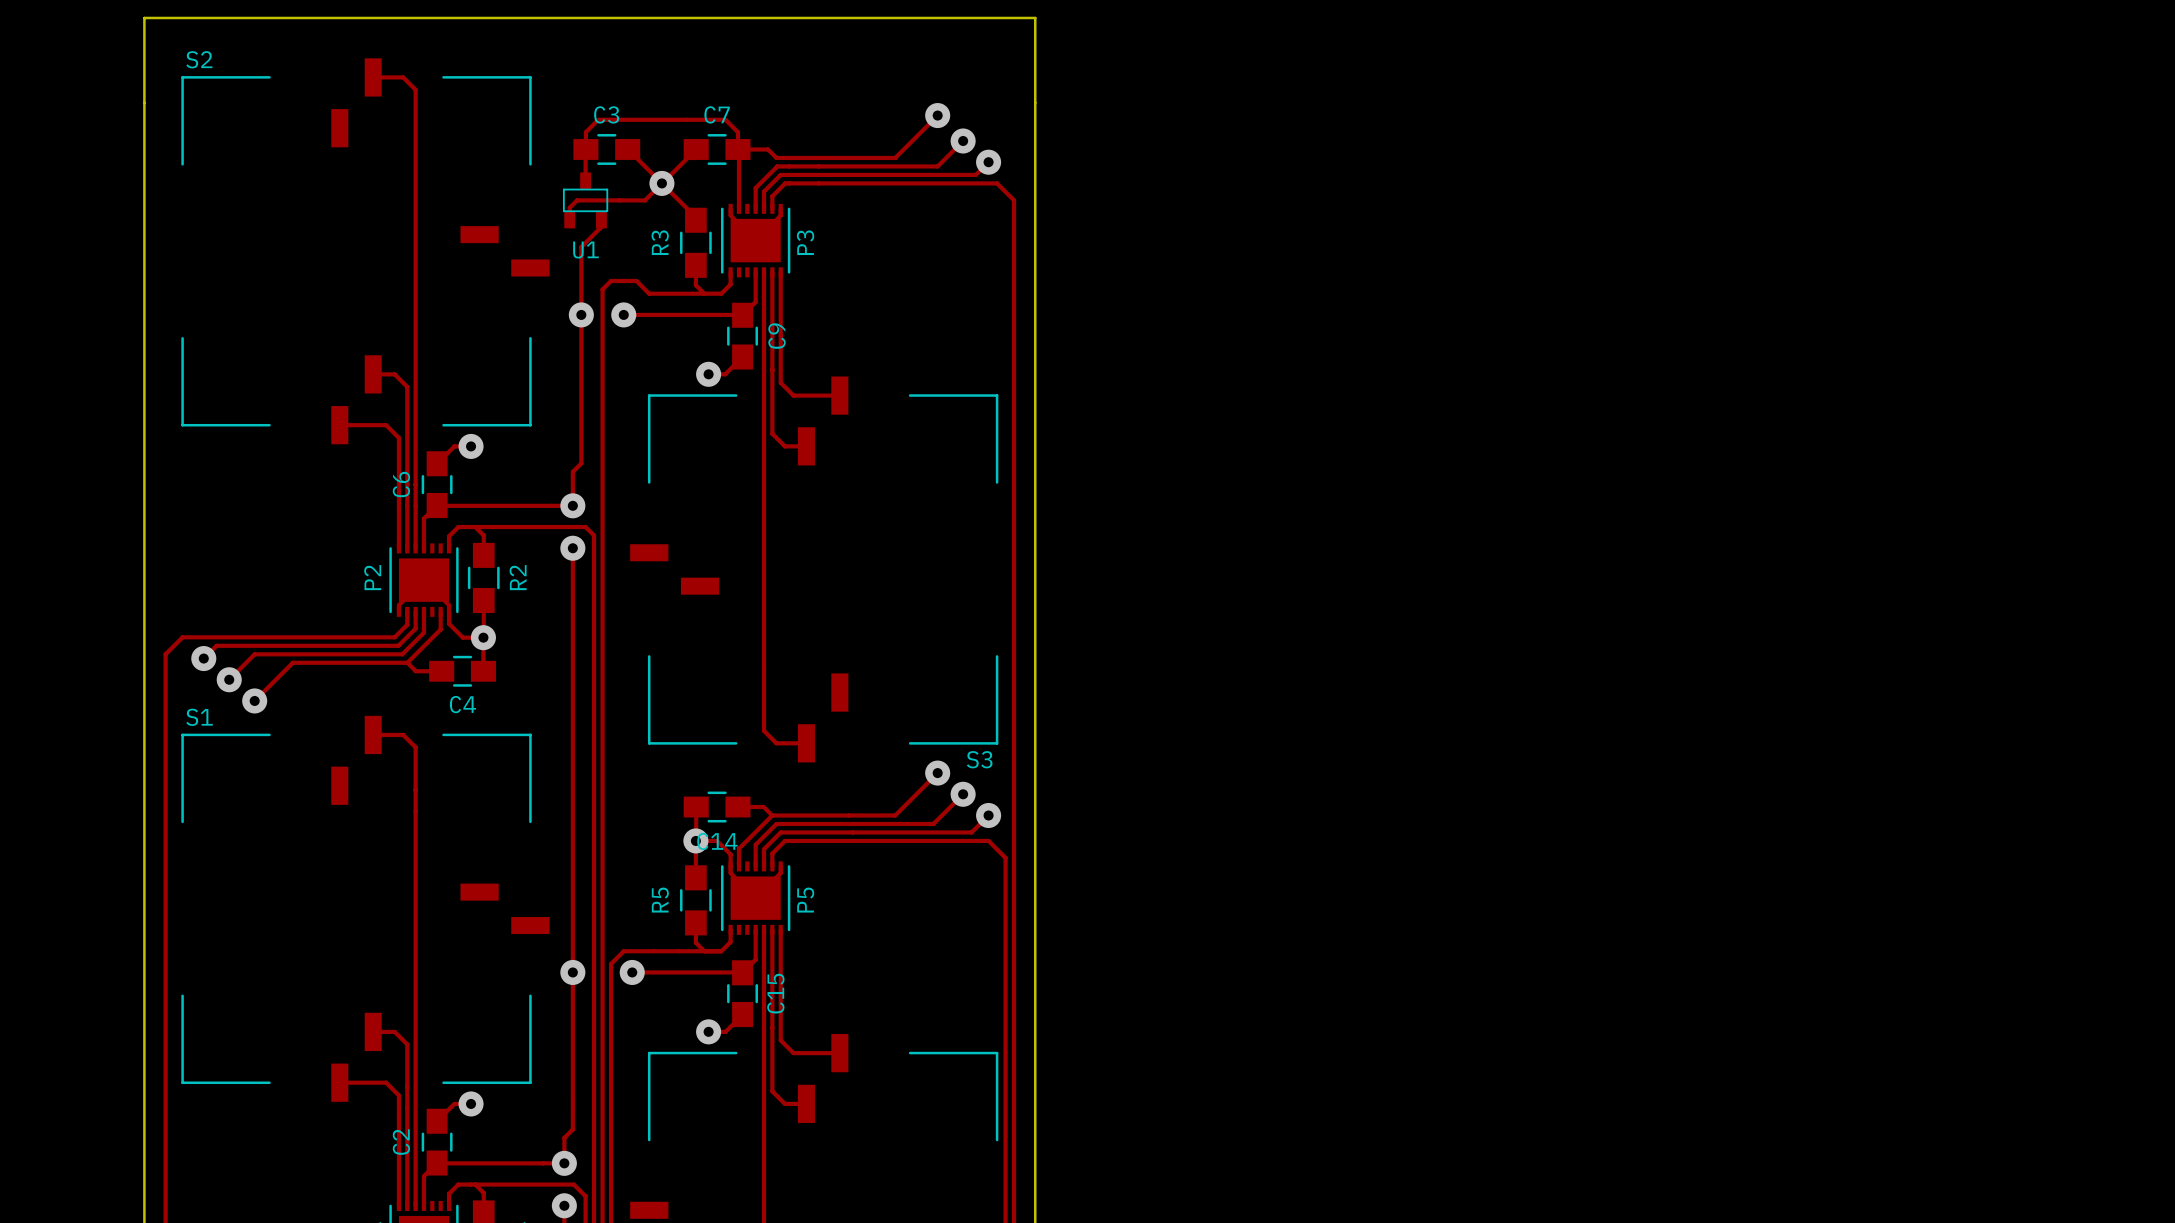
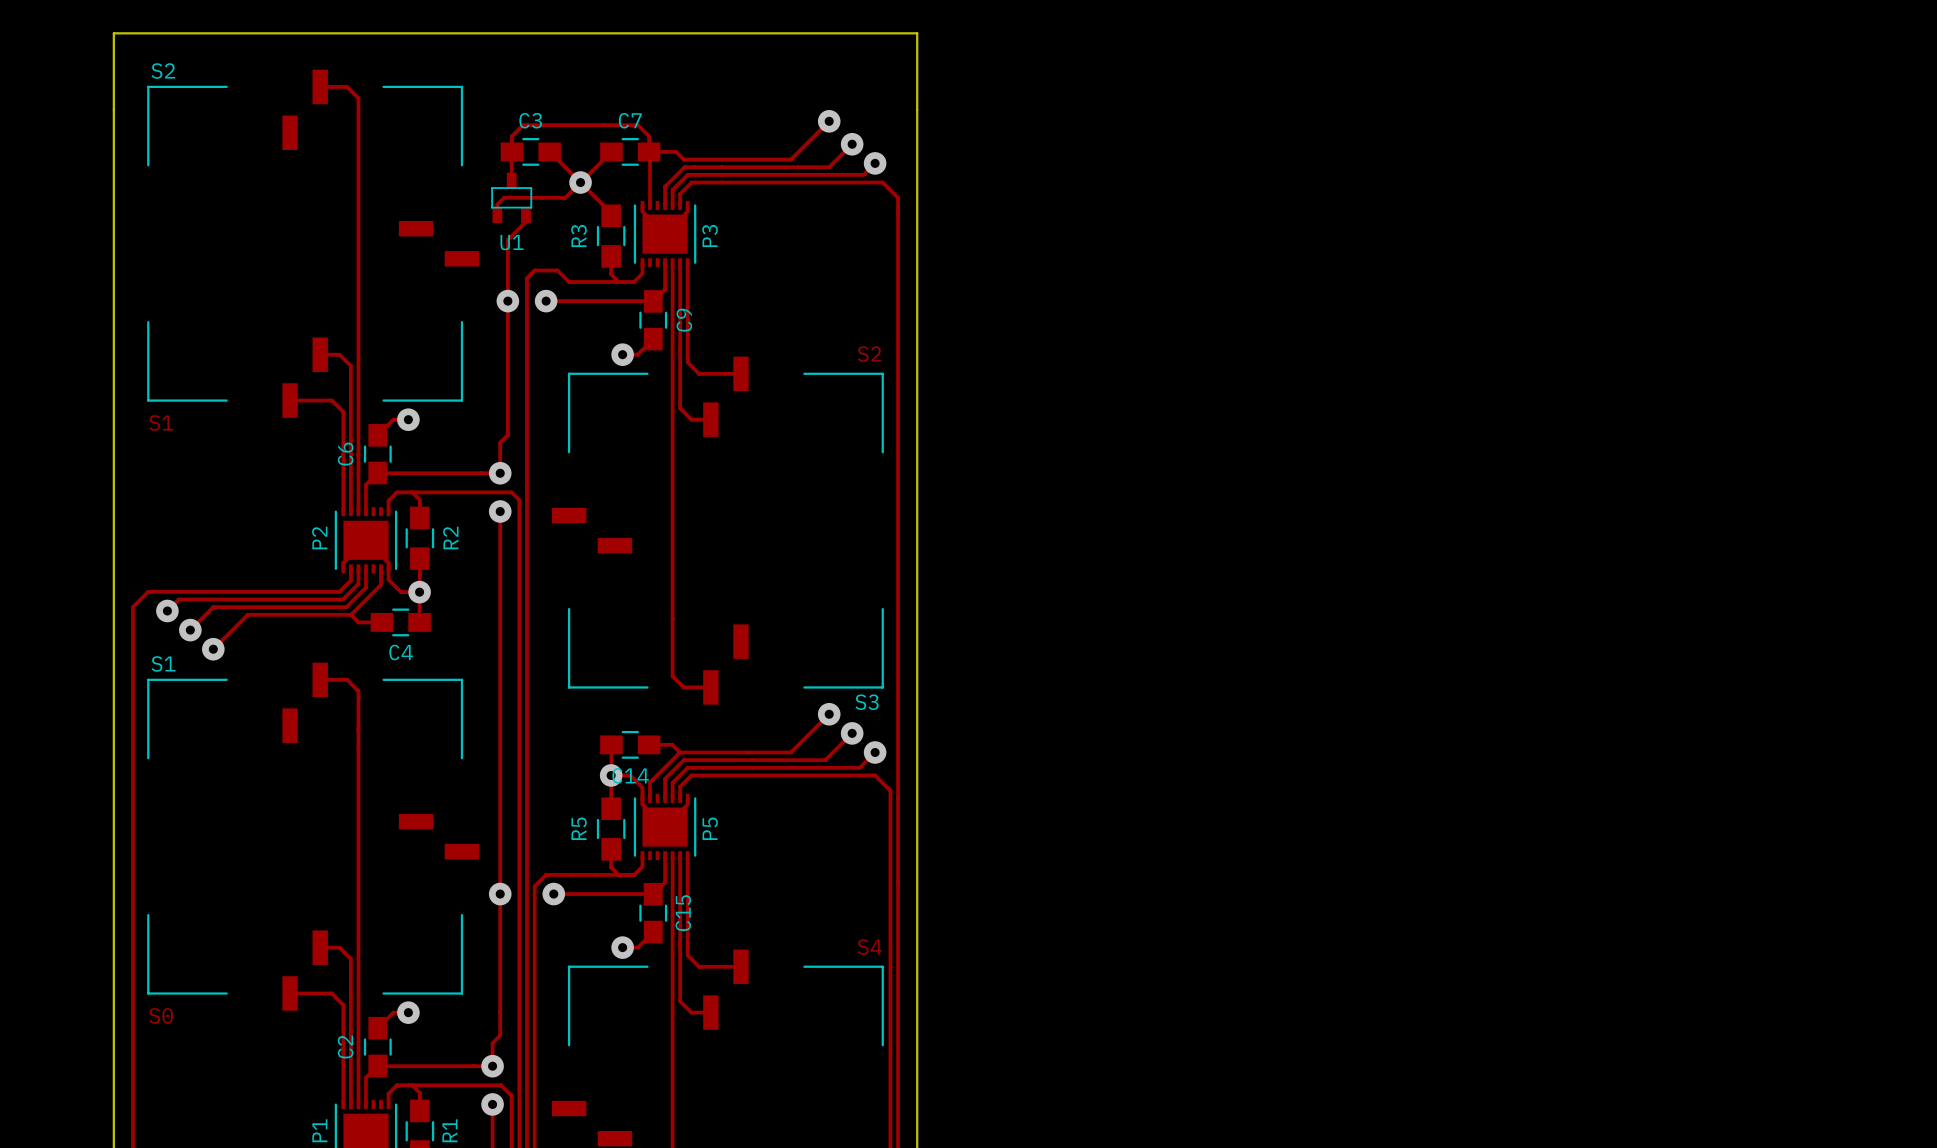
text: none -> S2 (869, 354)
text: none -> S1 (161, 422)
text: none -> S4 (869, 947)
text: none -> S0 (161, 1015)

